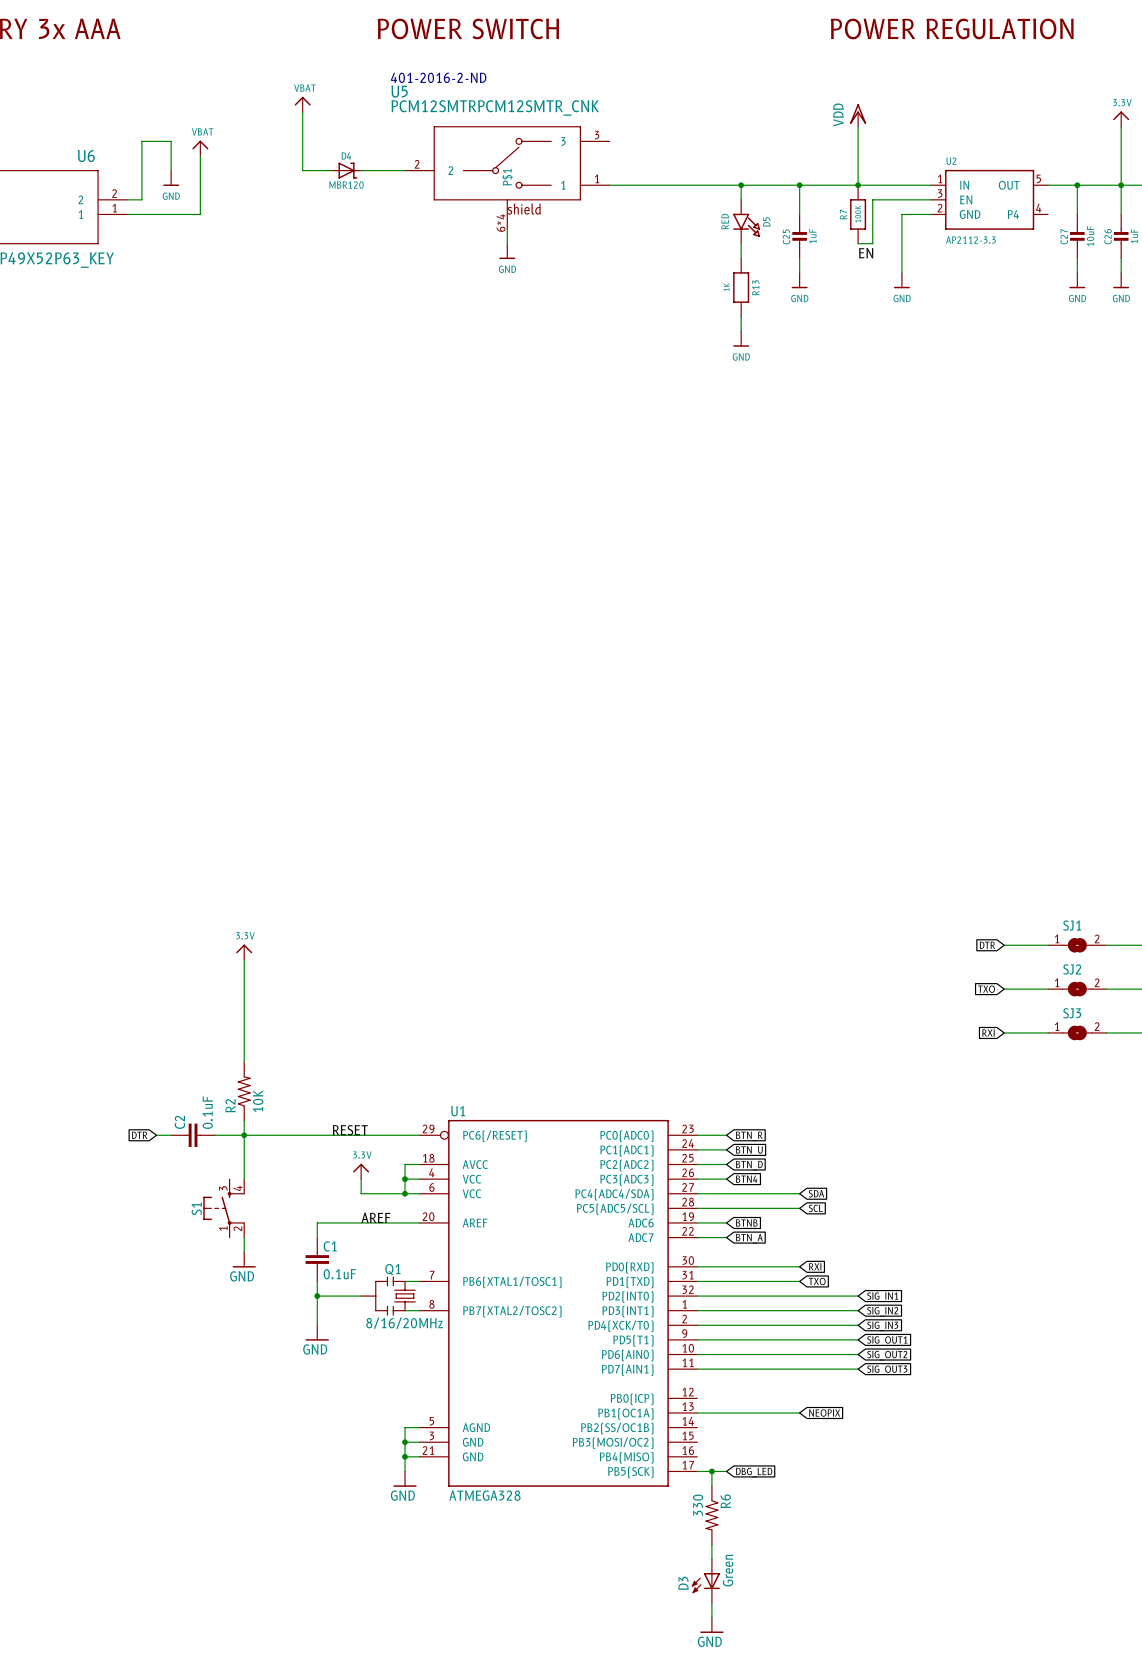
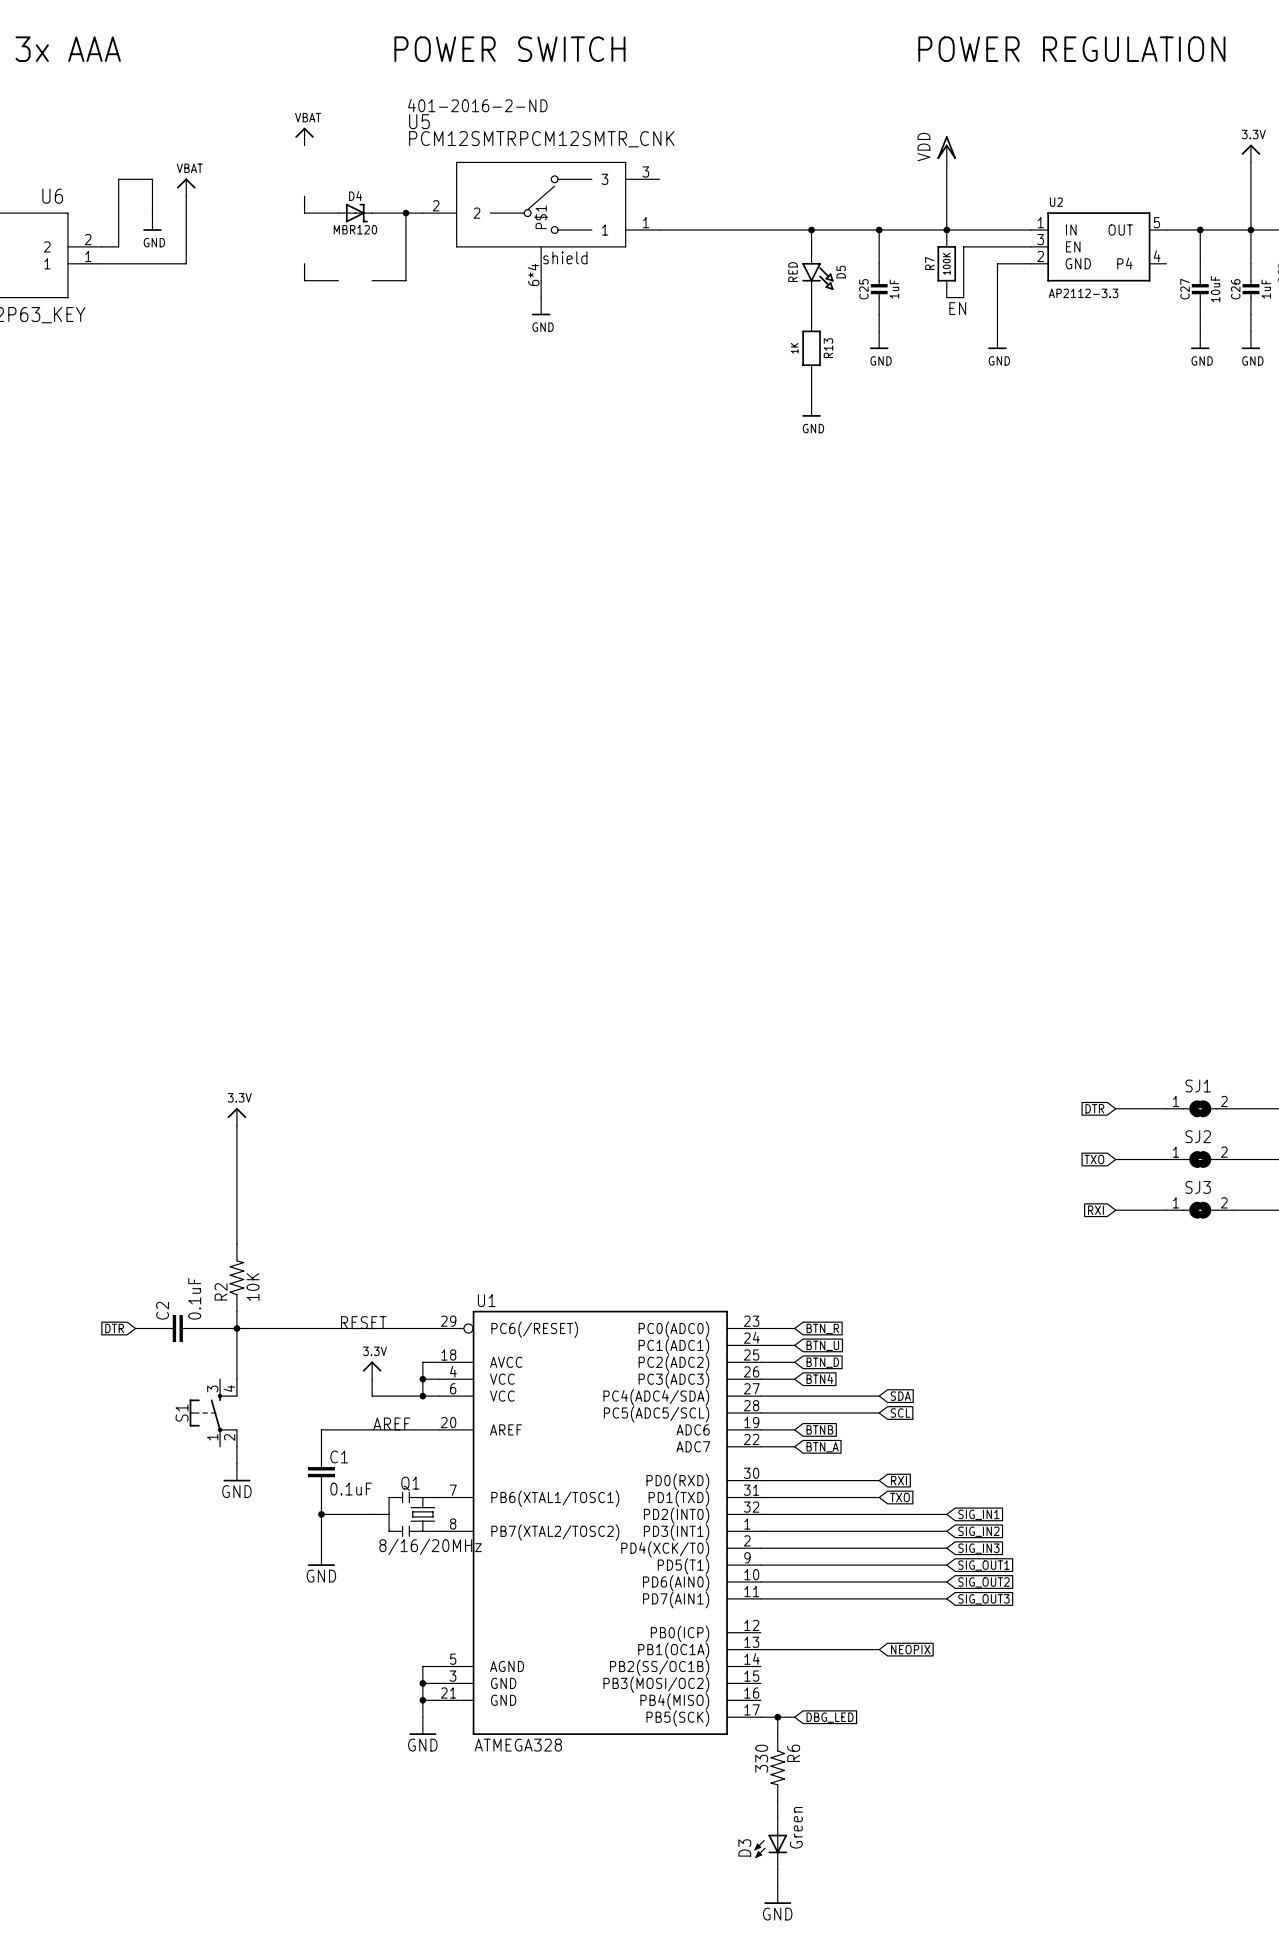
wire: (302, 112) (302, 155) -> none
wire: none -> (405, 213) (405, 280) (372, 280)
junction: none -> (405, 213)
wire: none -> (304, 263) (304, 280) (338, 280)

